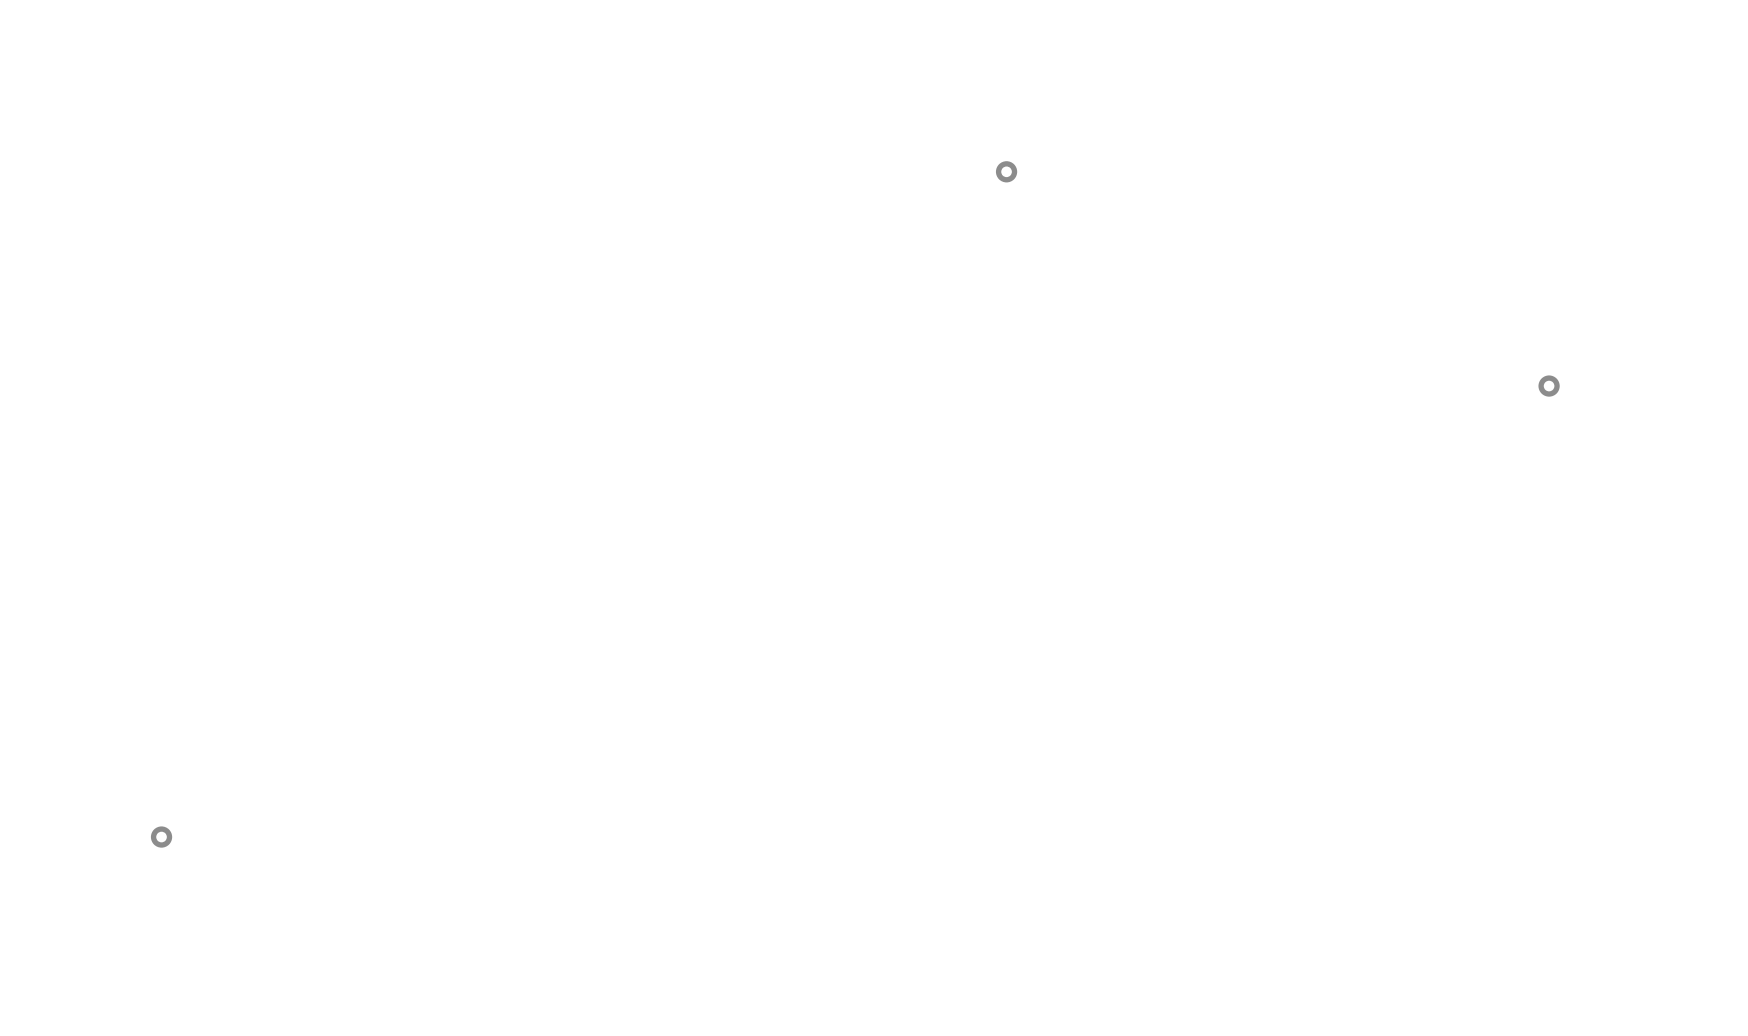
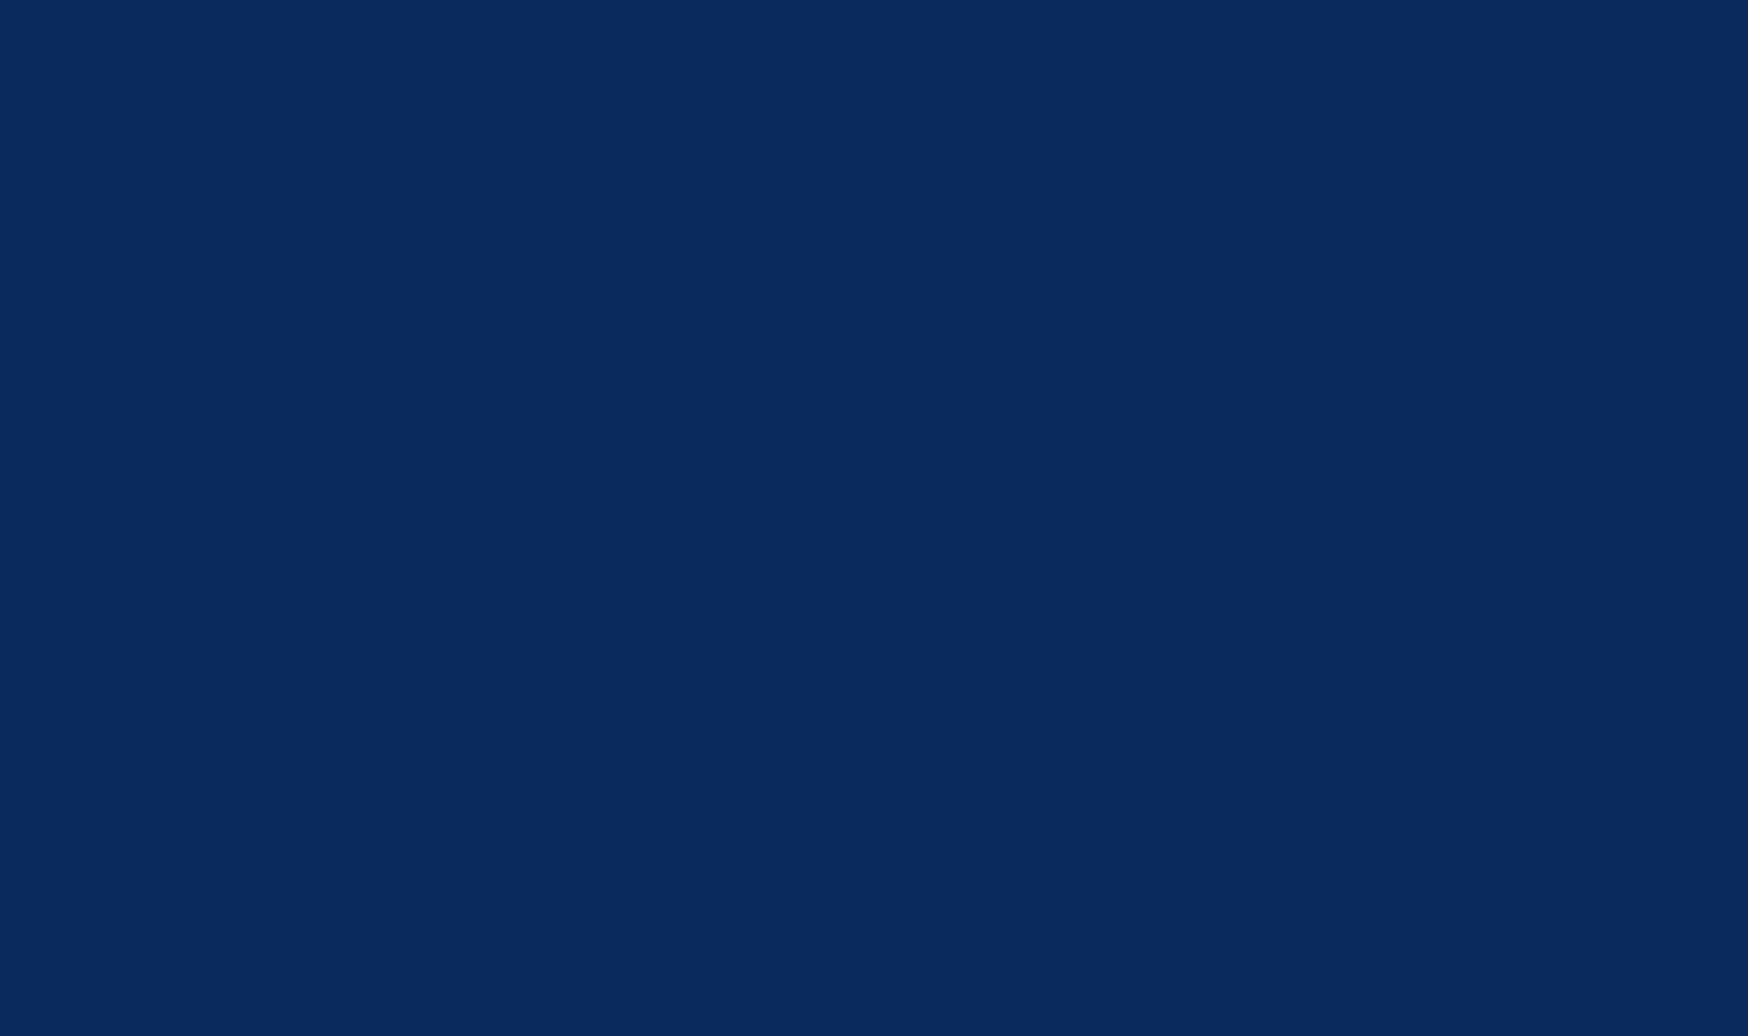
via: (1006, 171) -> none
via: (1549, 386) -> none
via: (161, 837) -> none

